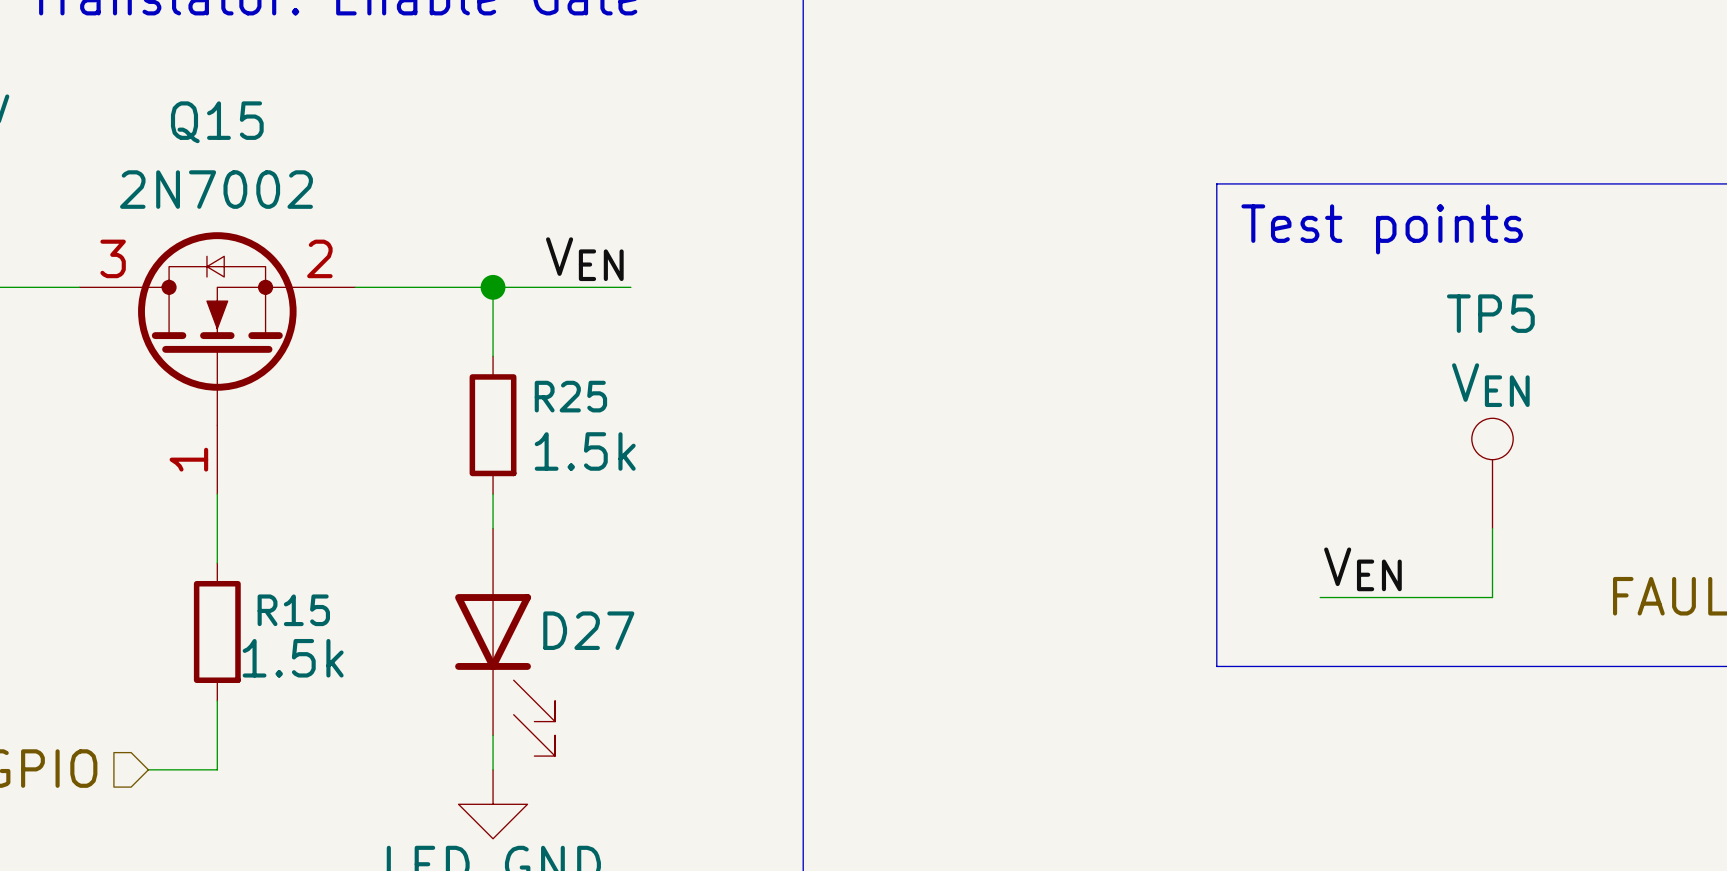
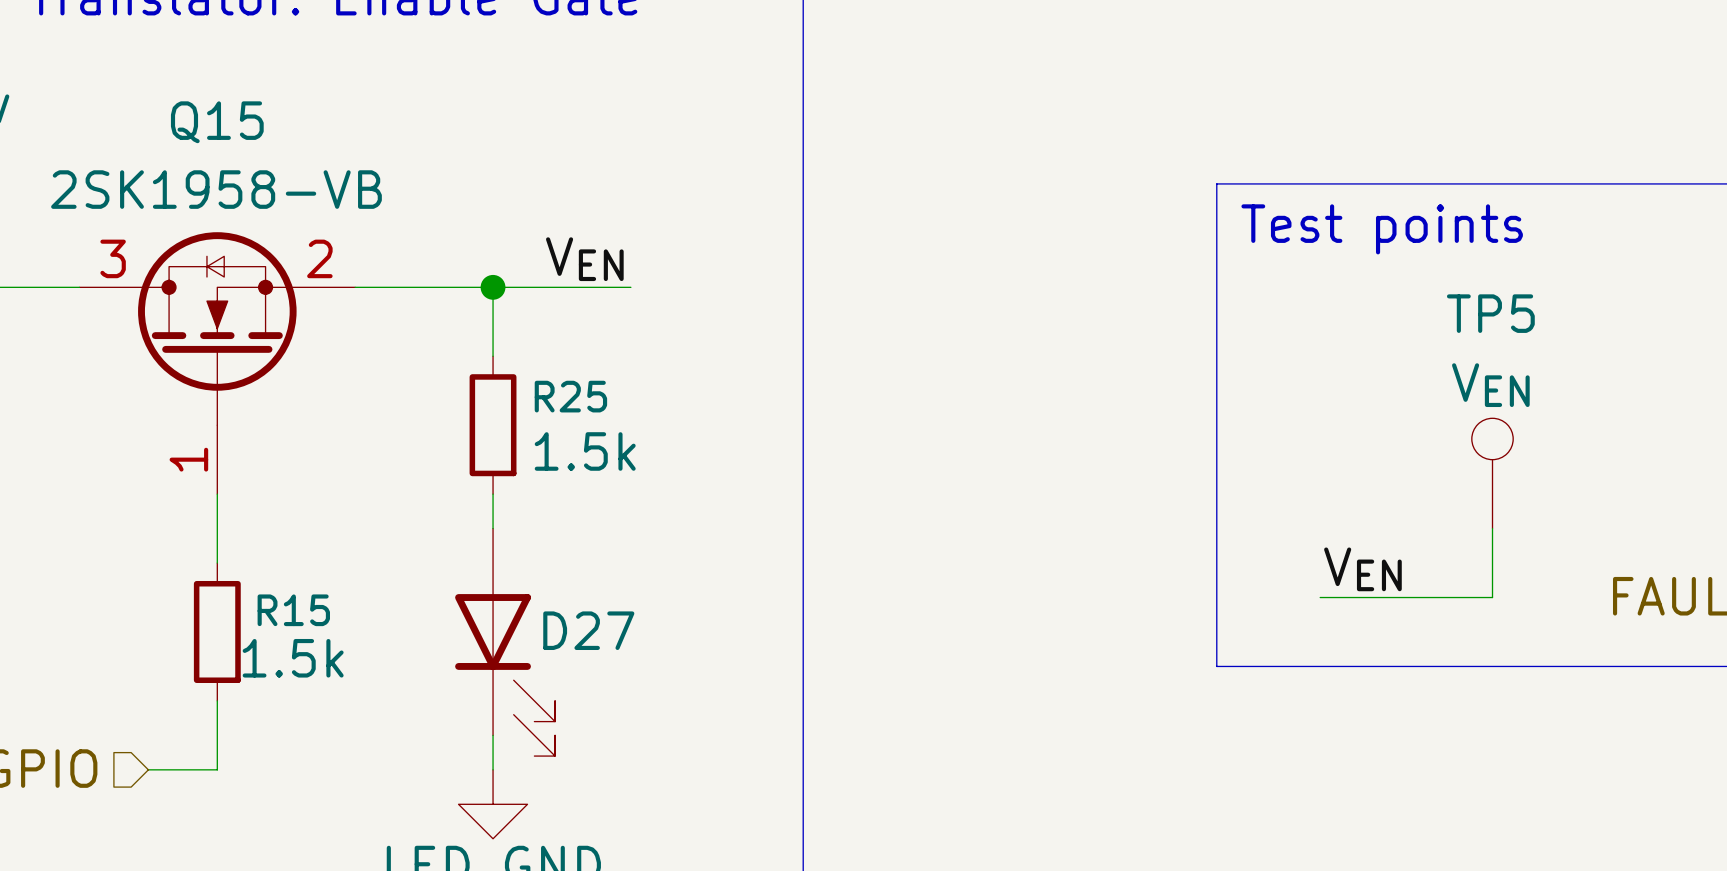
Q15 value: 2N7002 (216, 189) -> 2SK1958-VB (216, 189)

